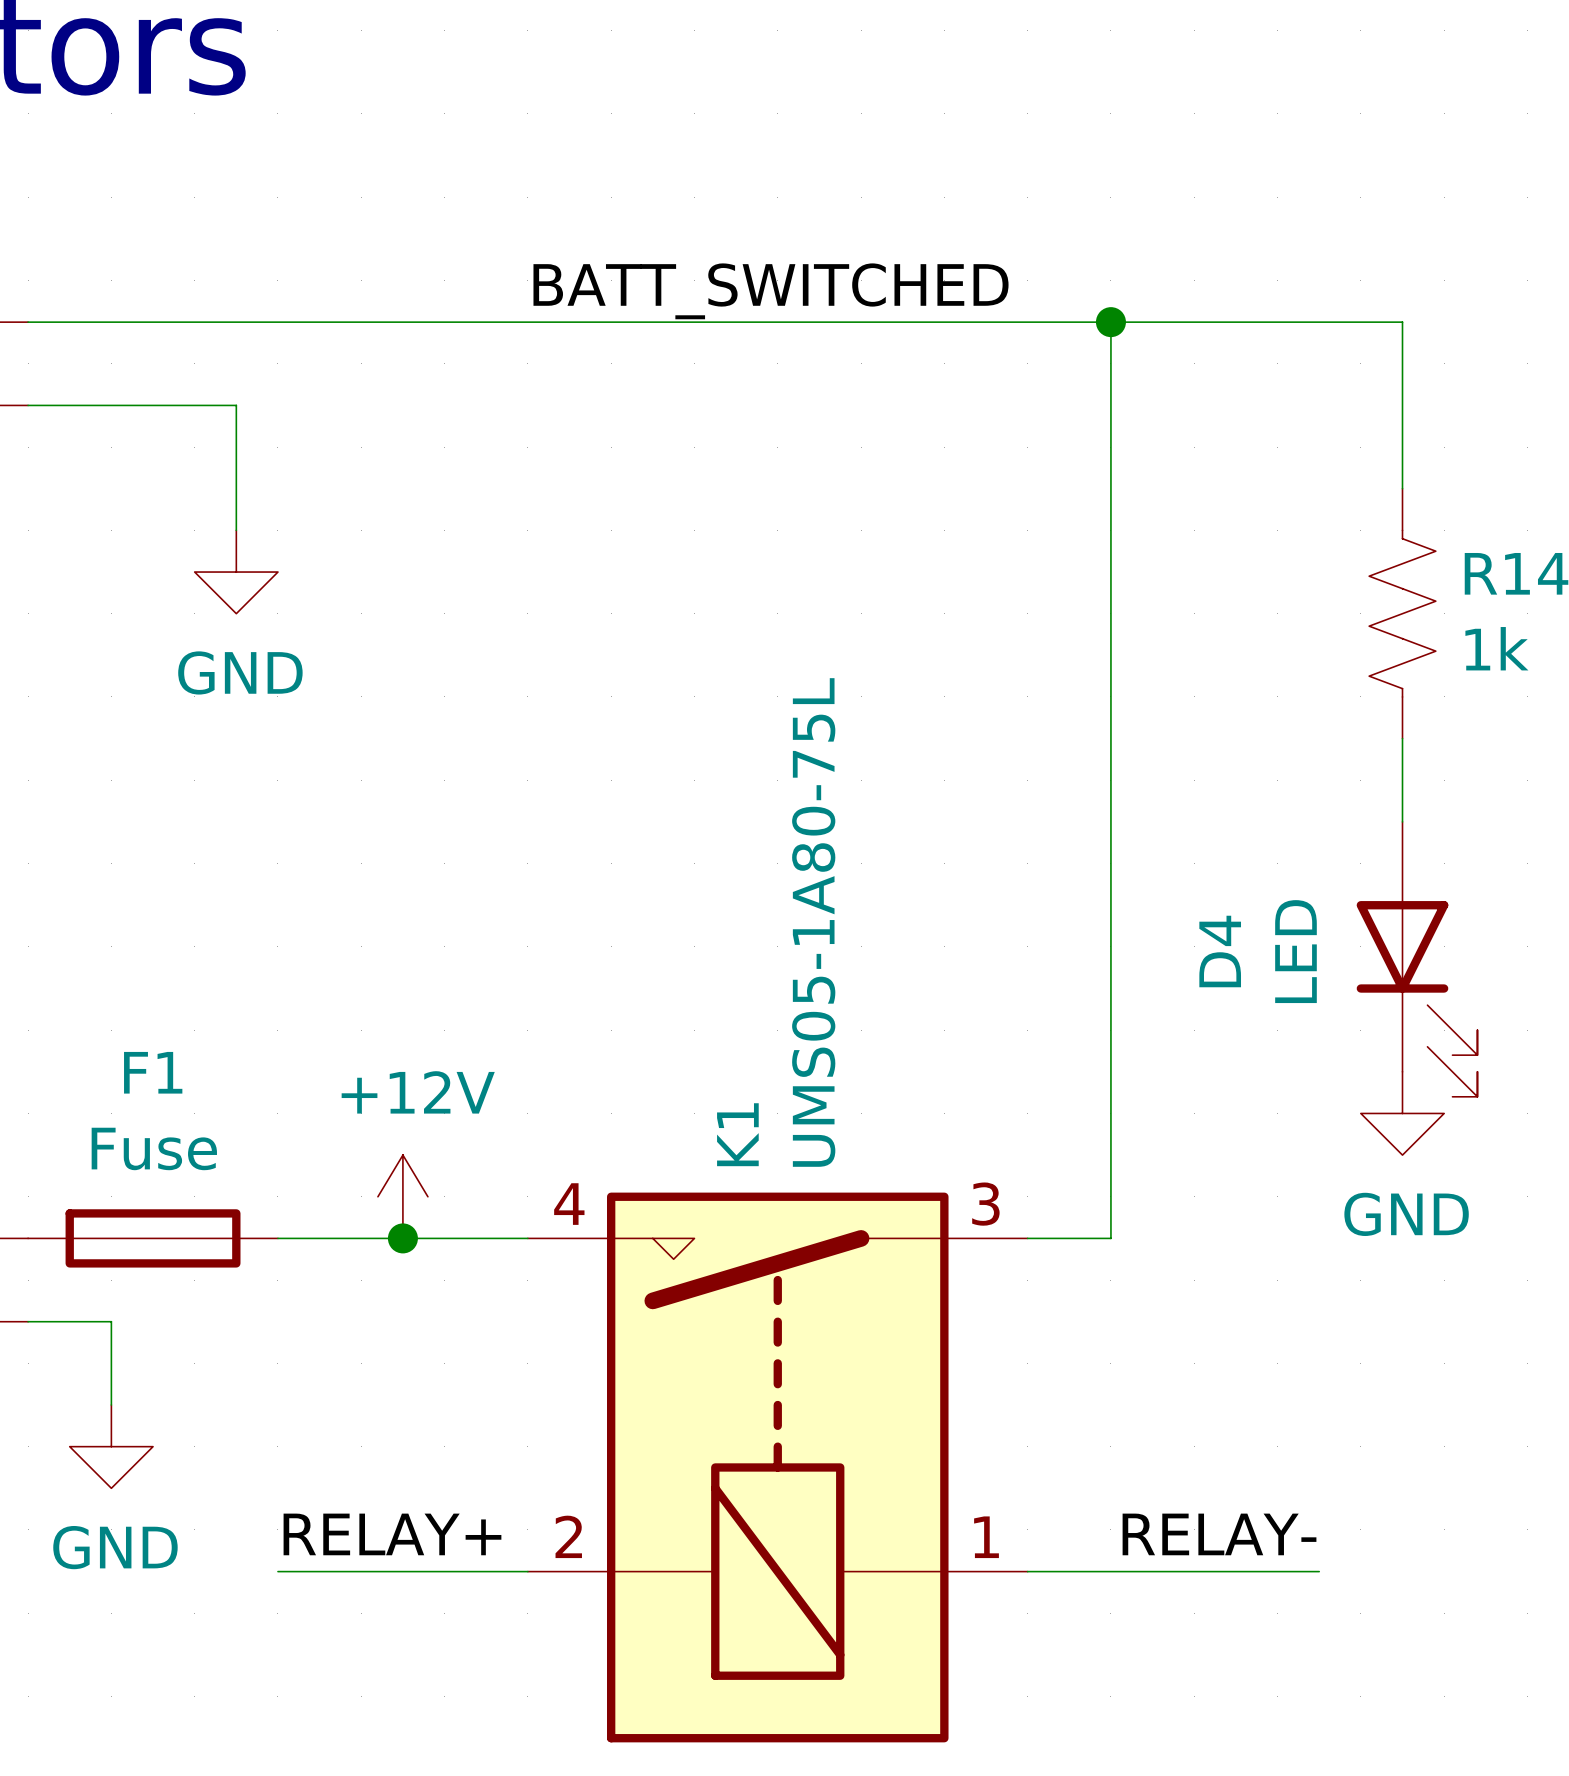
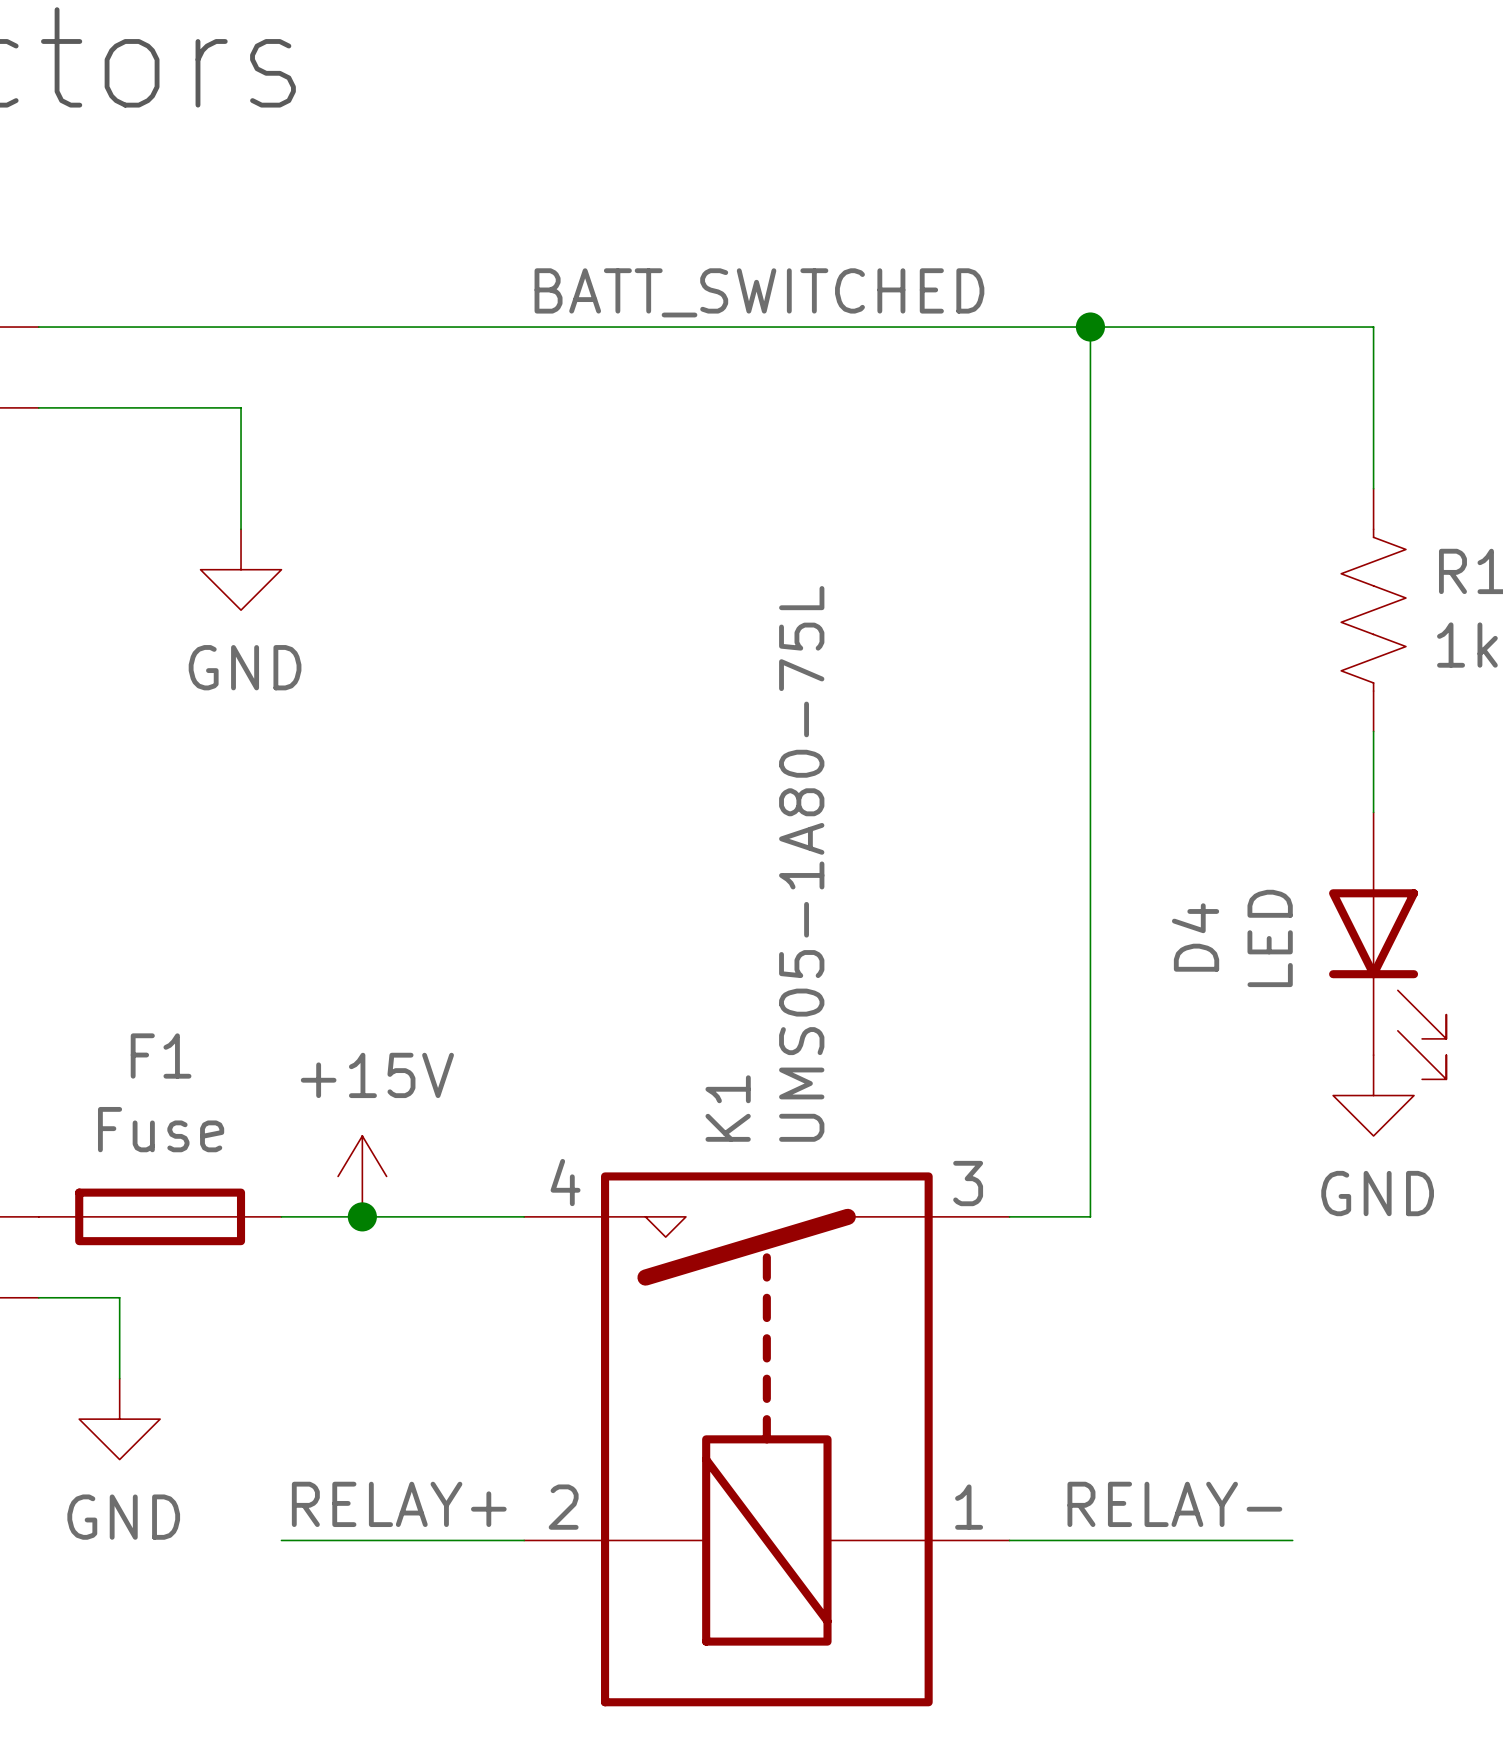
power symbol: none -> +15V (362, 1176)
power symbol: +12V (402, 1196) -> none
junction position: (402, 1238) -> (362, 1216)

